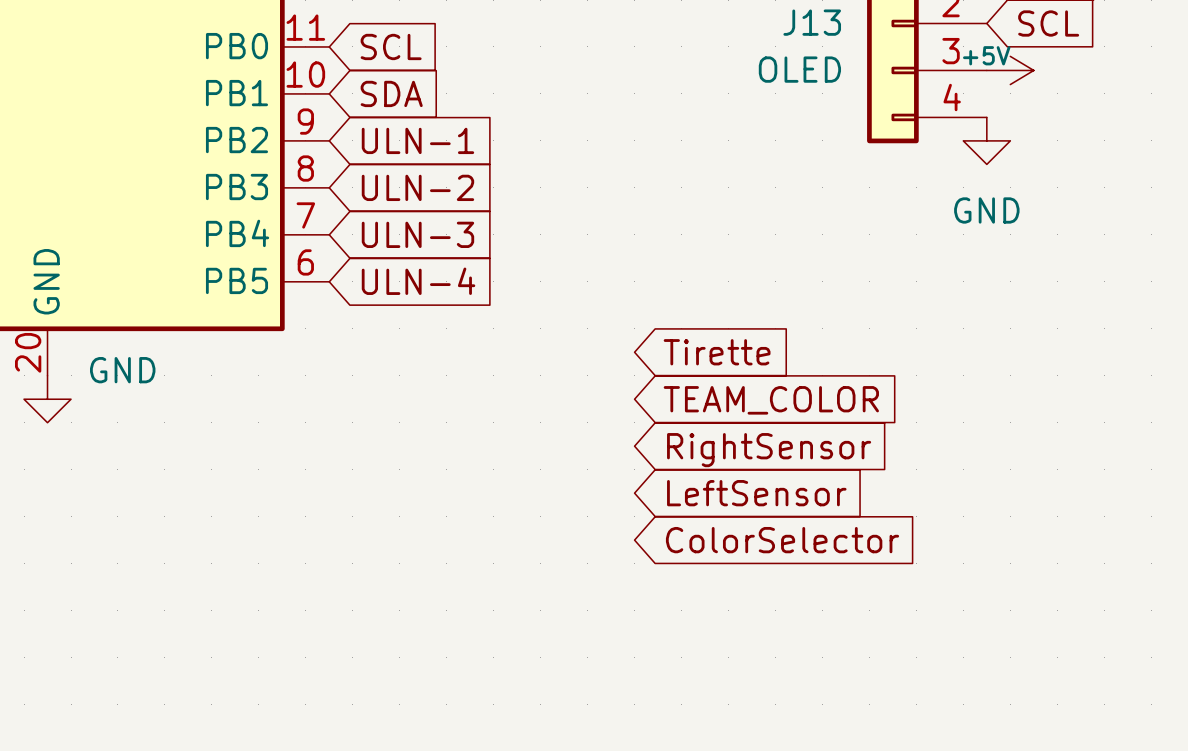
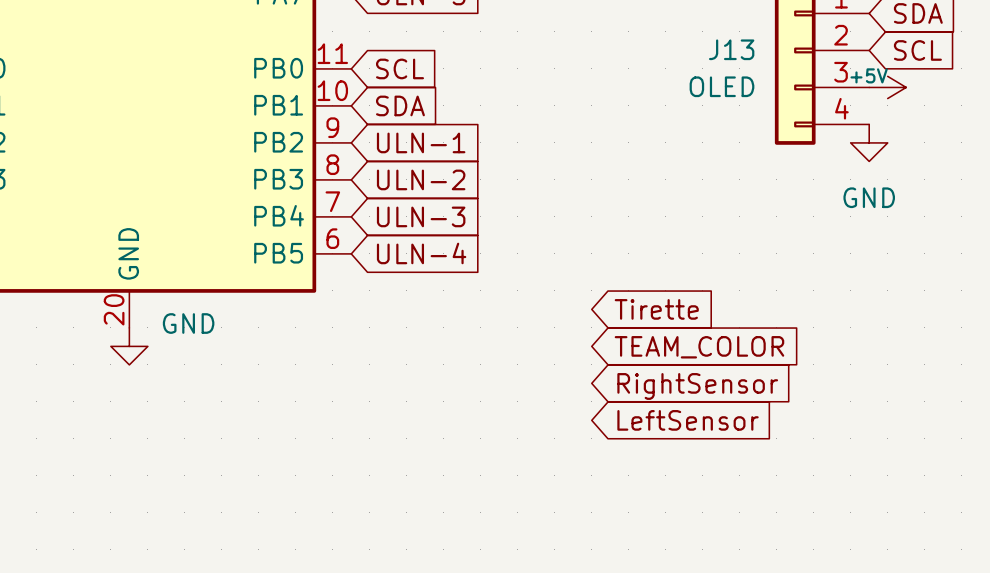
global label: ColorSelector (782, 540) -> none

